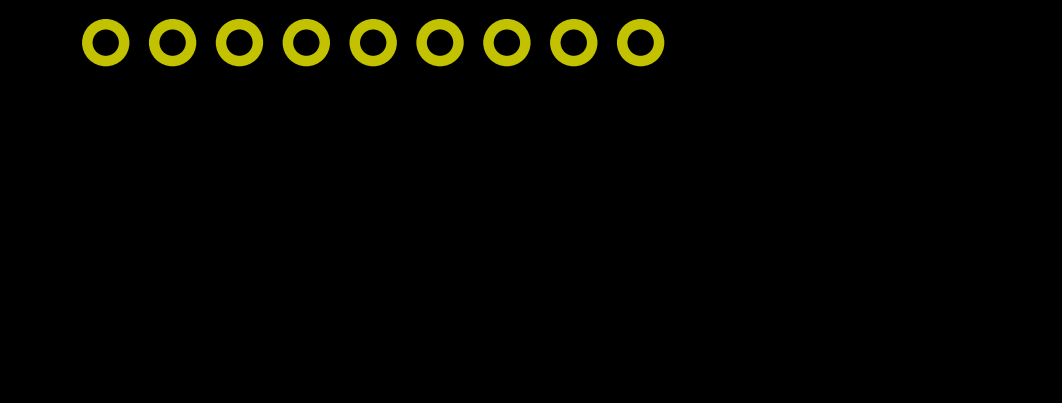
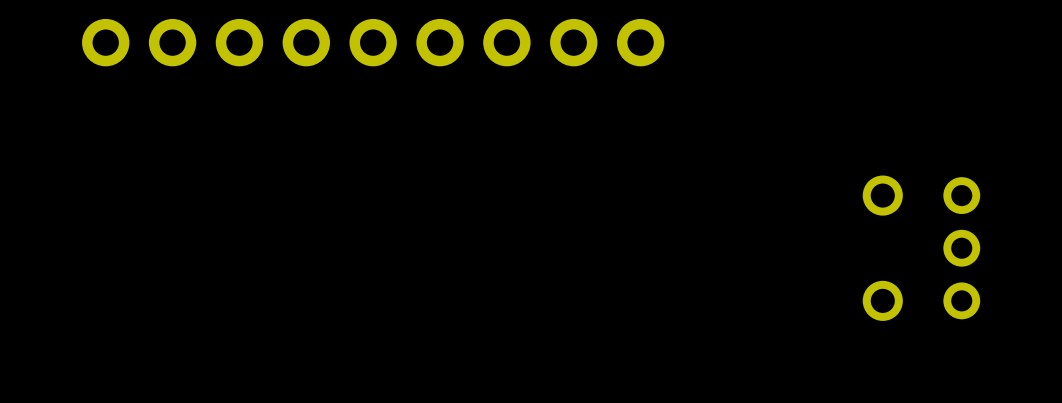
part: none -> (921, 248)

